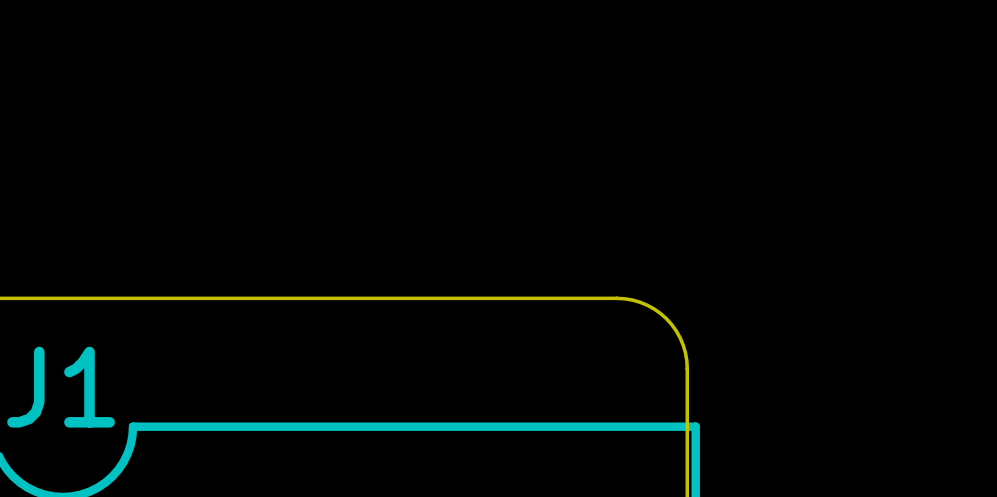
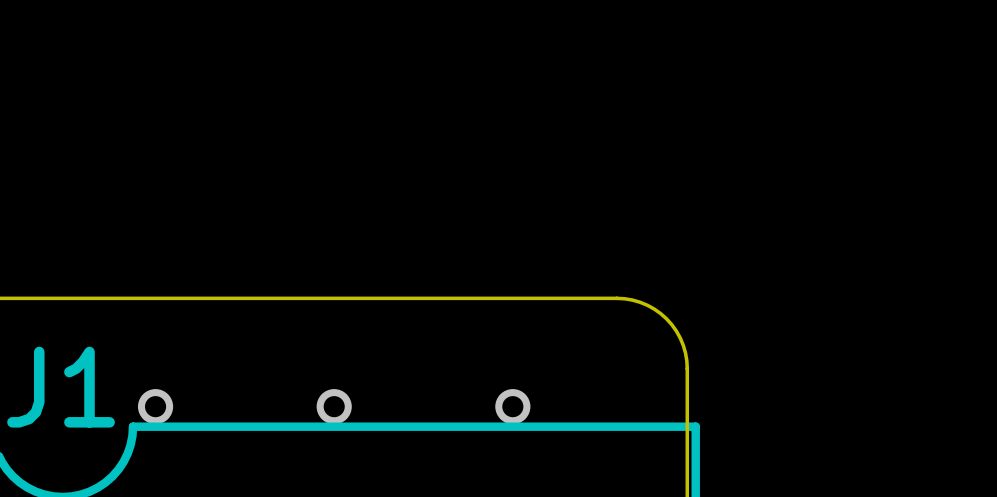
via: none -> (155, 406)
via: none -> (334, 406)
via: none -> (512, 406)

